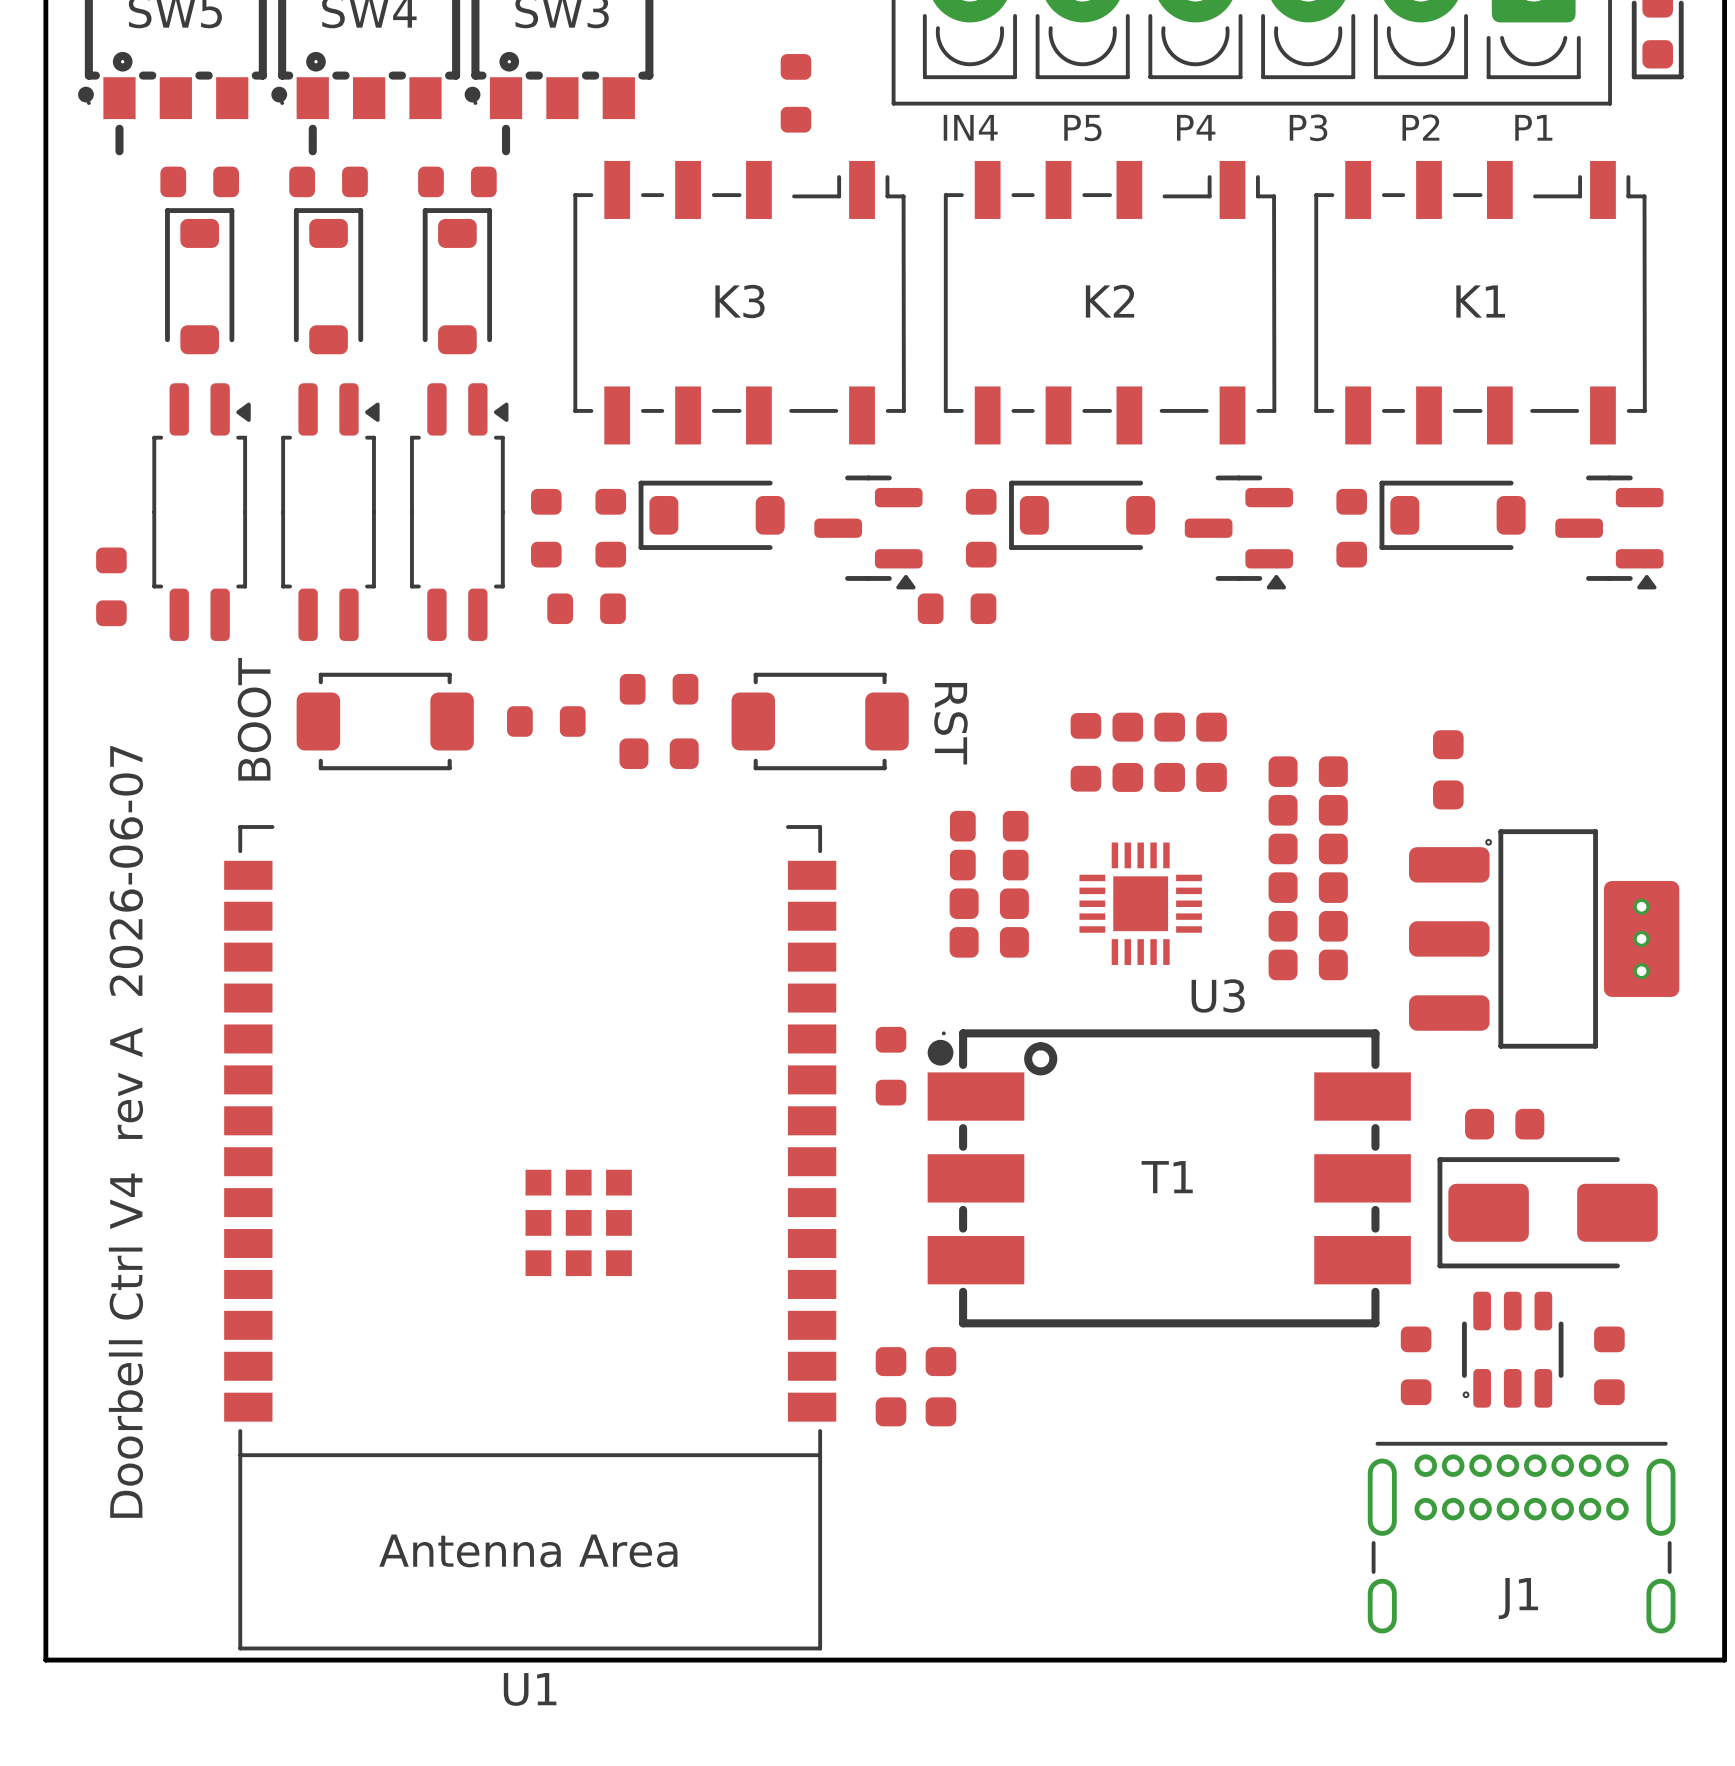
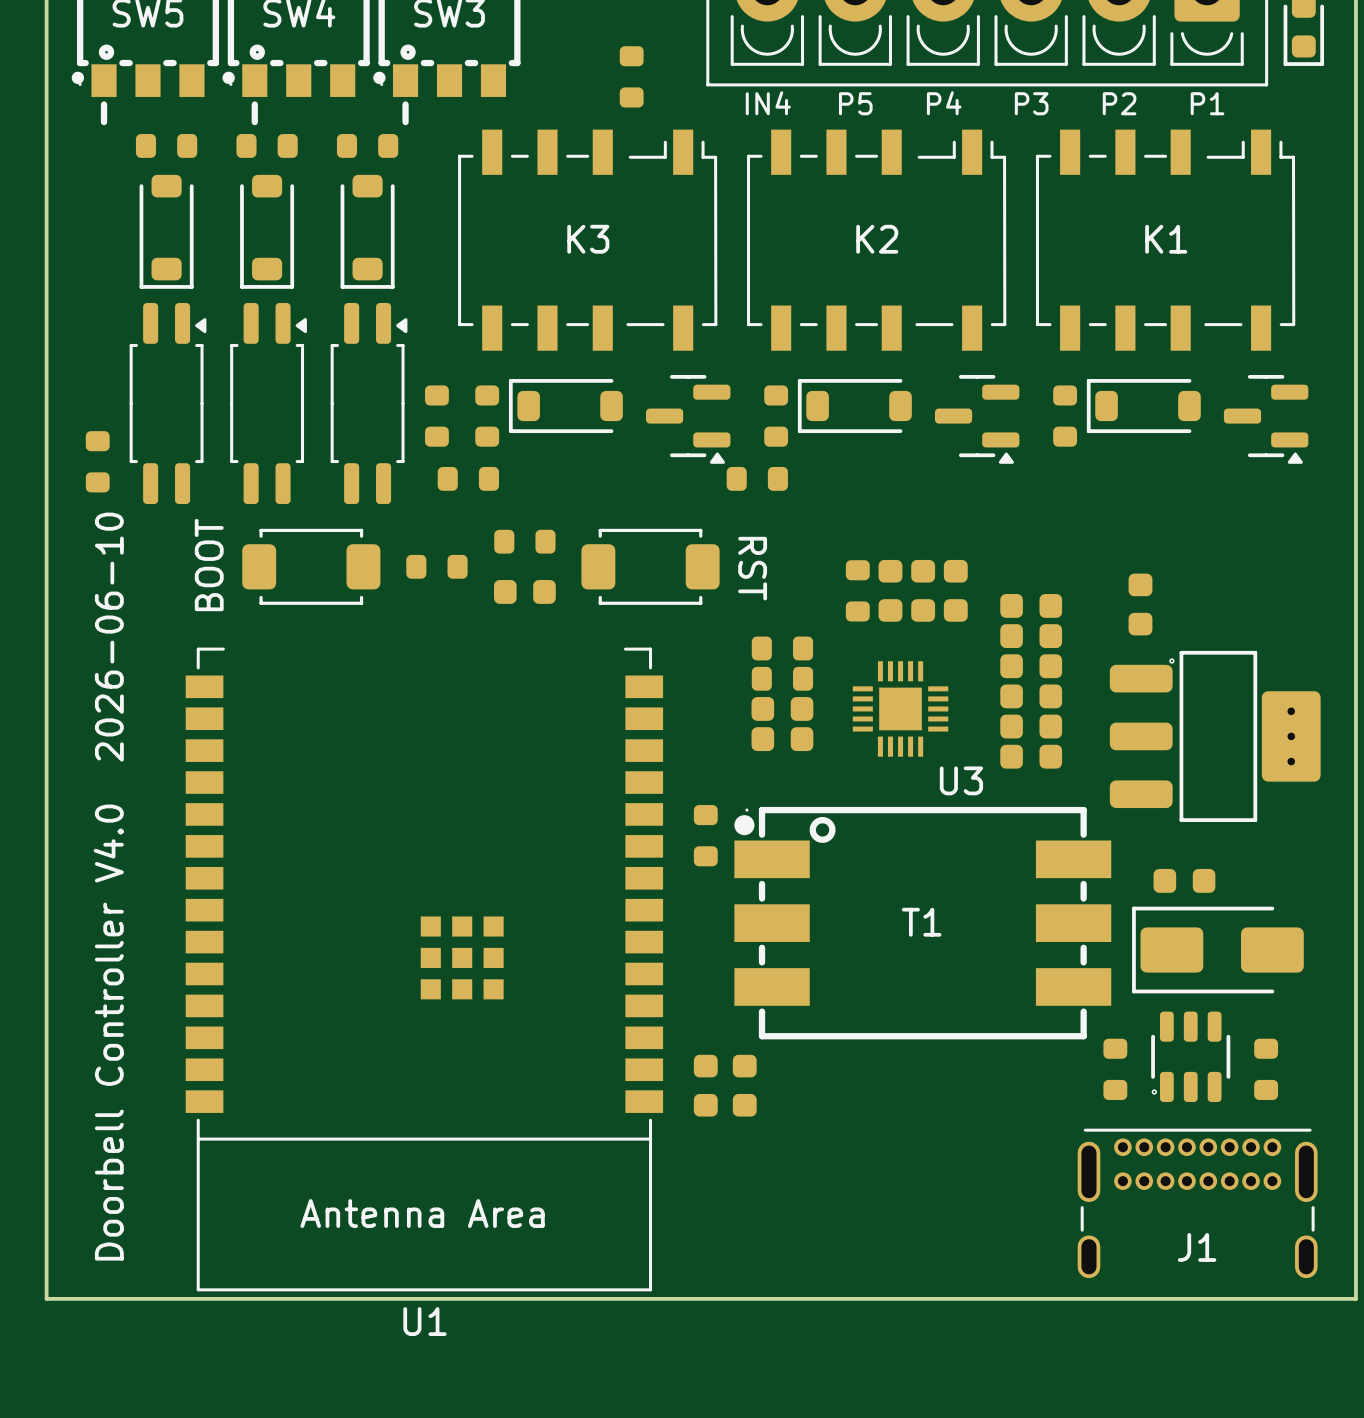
part rotation: 0° (199, 281) -> 180° (166, 231)
part rotation: 0° (328, 281) -> 180° (267, 231)
part rotation: 0° (457, 281) -> 180° (367, 231)
text: Doorbell Ctrl V4 rev A 2026-06-07 (125, 1131) -> Doorbell Controller V4.0 2026-06-10 (108, 886)

